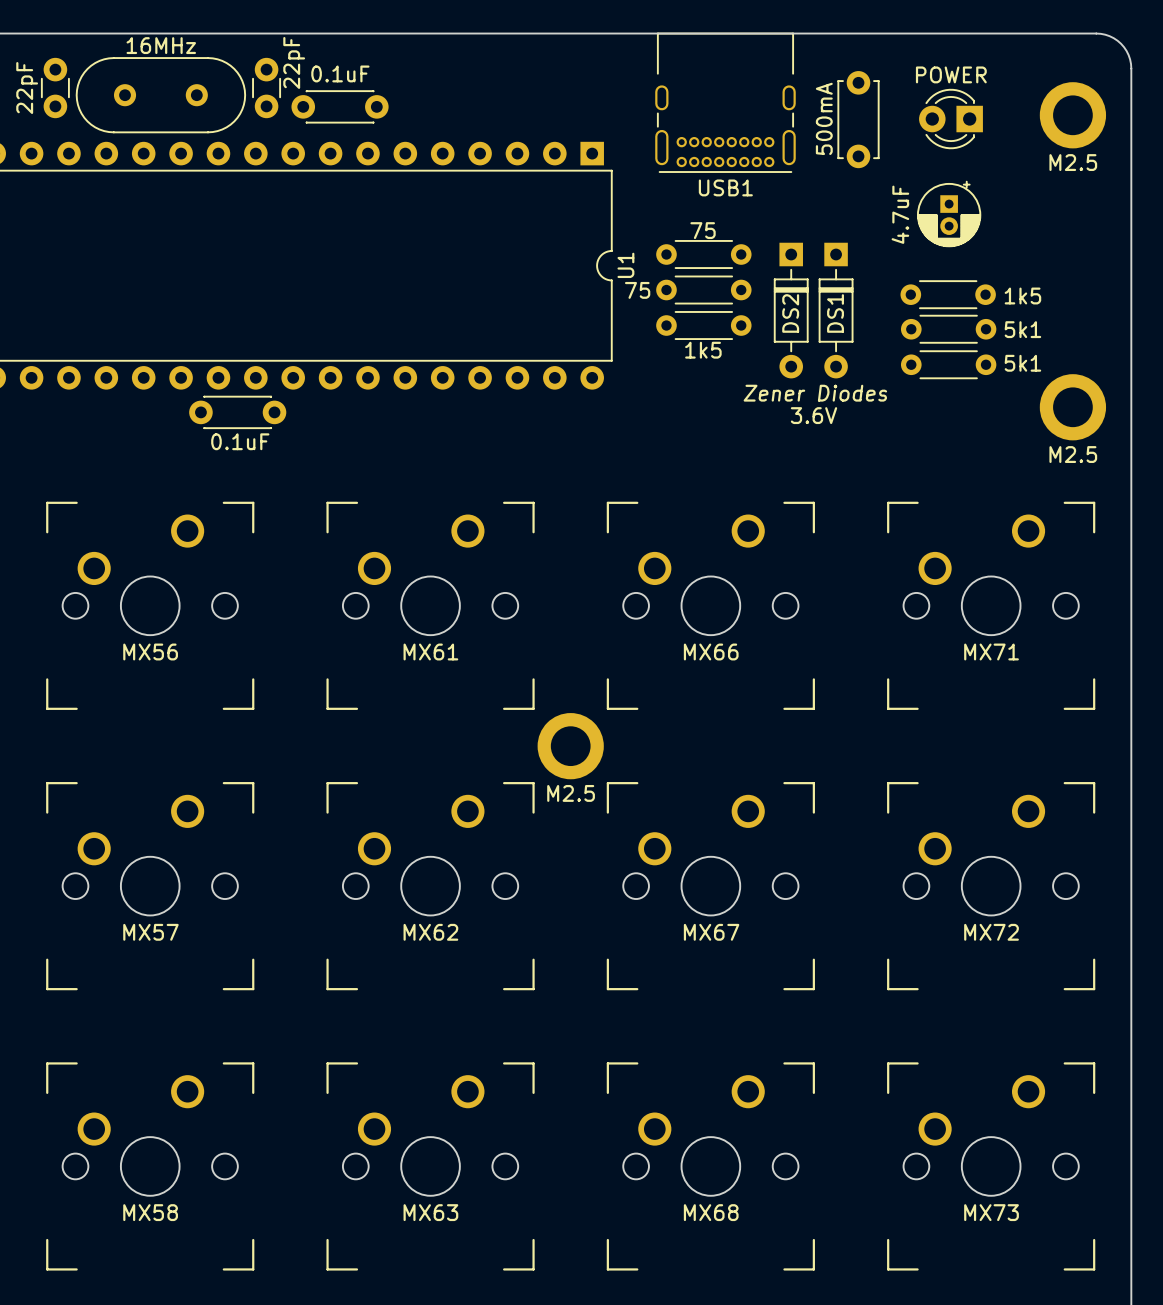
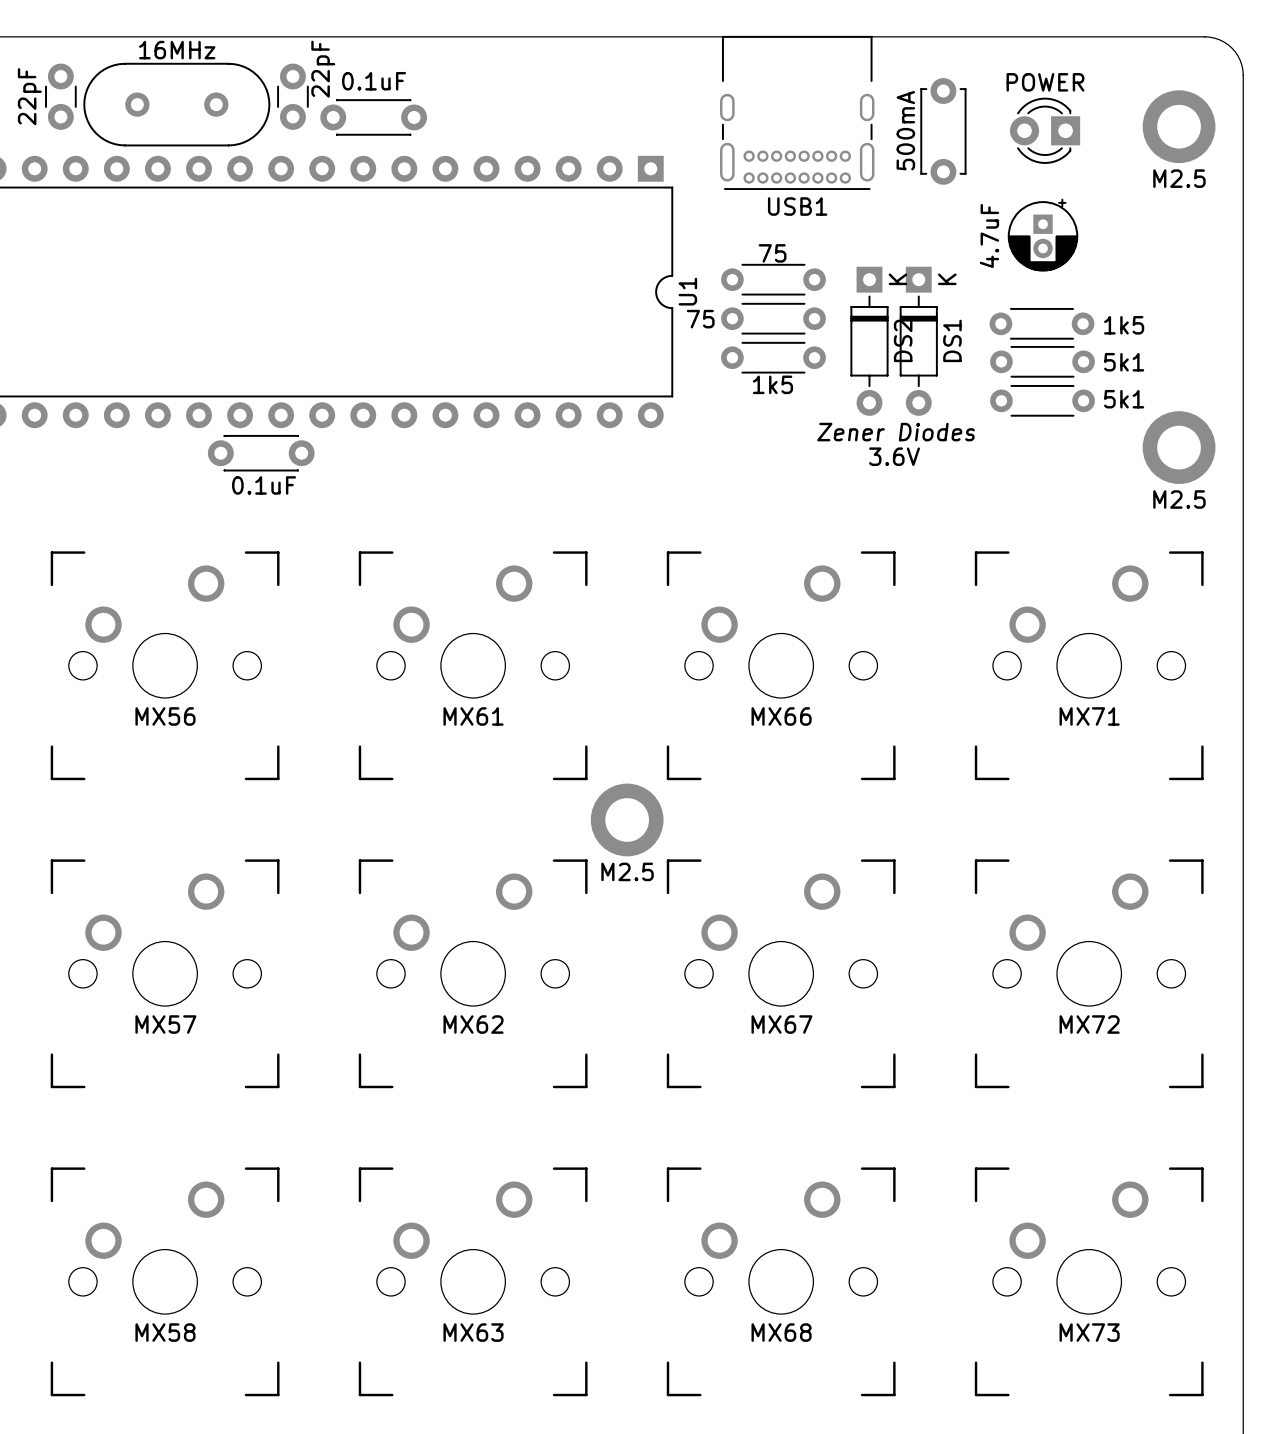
DS2 text: none -> K (897, 279)
DS1 text: none -> K (947, 279)
DS2 name position: DS2 (790, 313) -> DS2 (903, 340)
DS1 name position: DS1 (835, 313) -> DS1 (952, 340)

